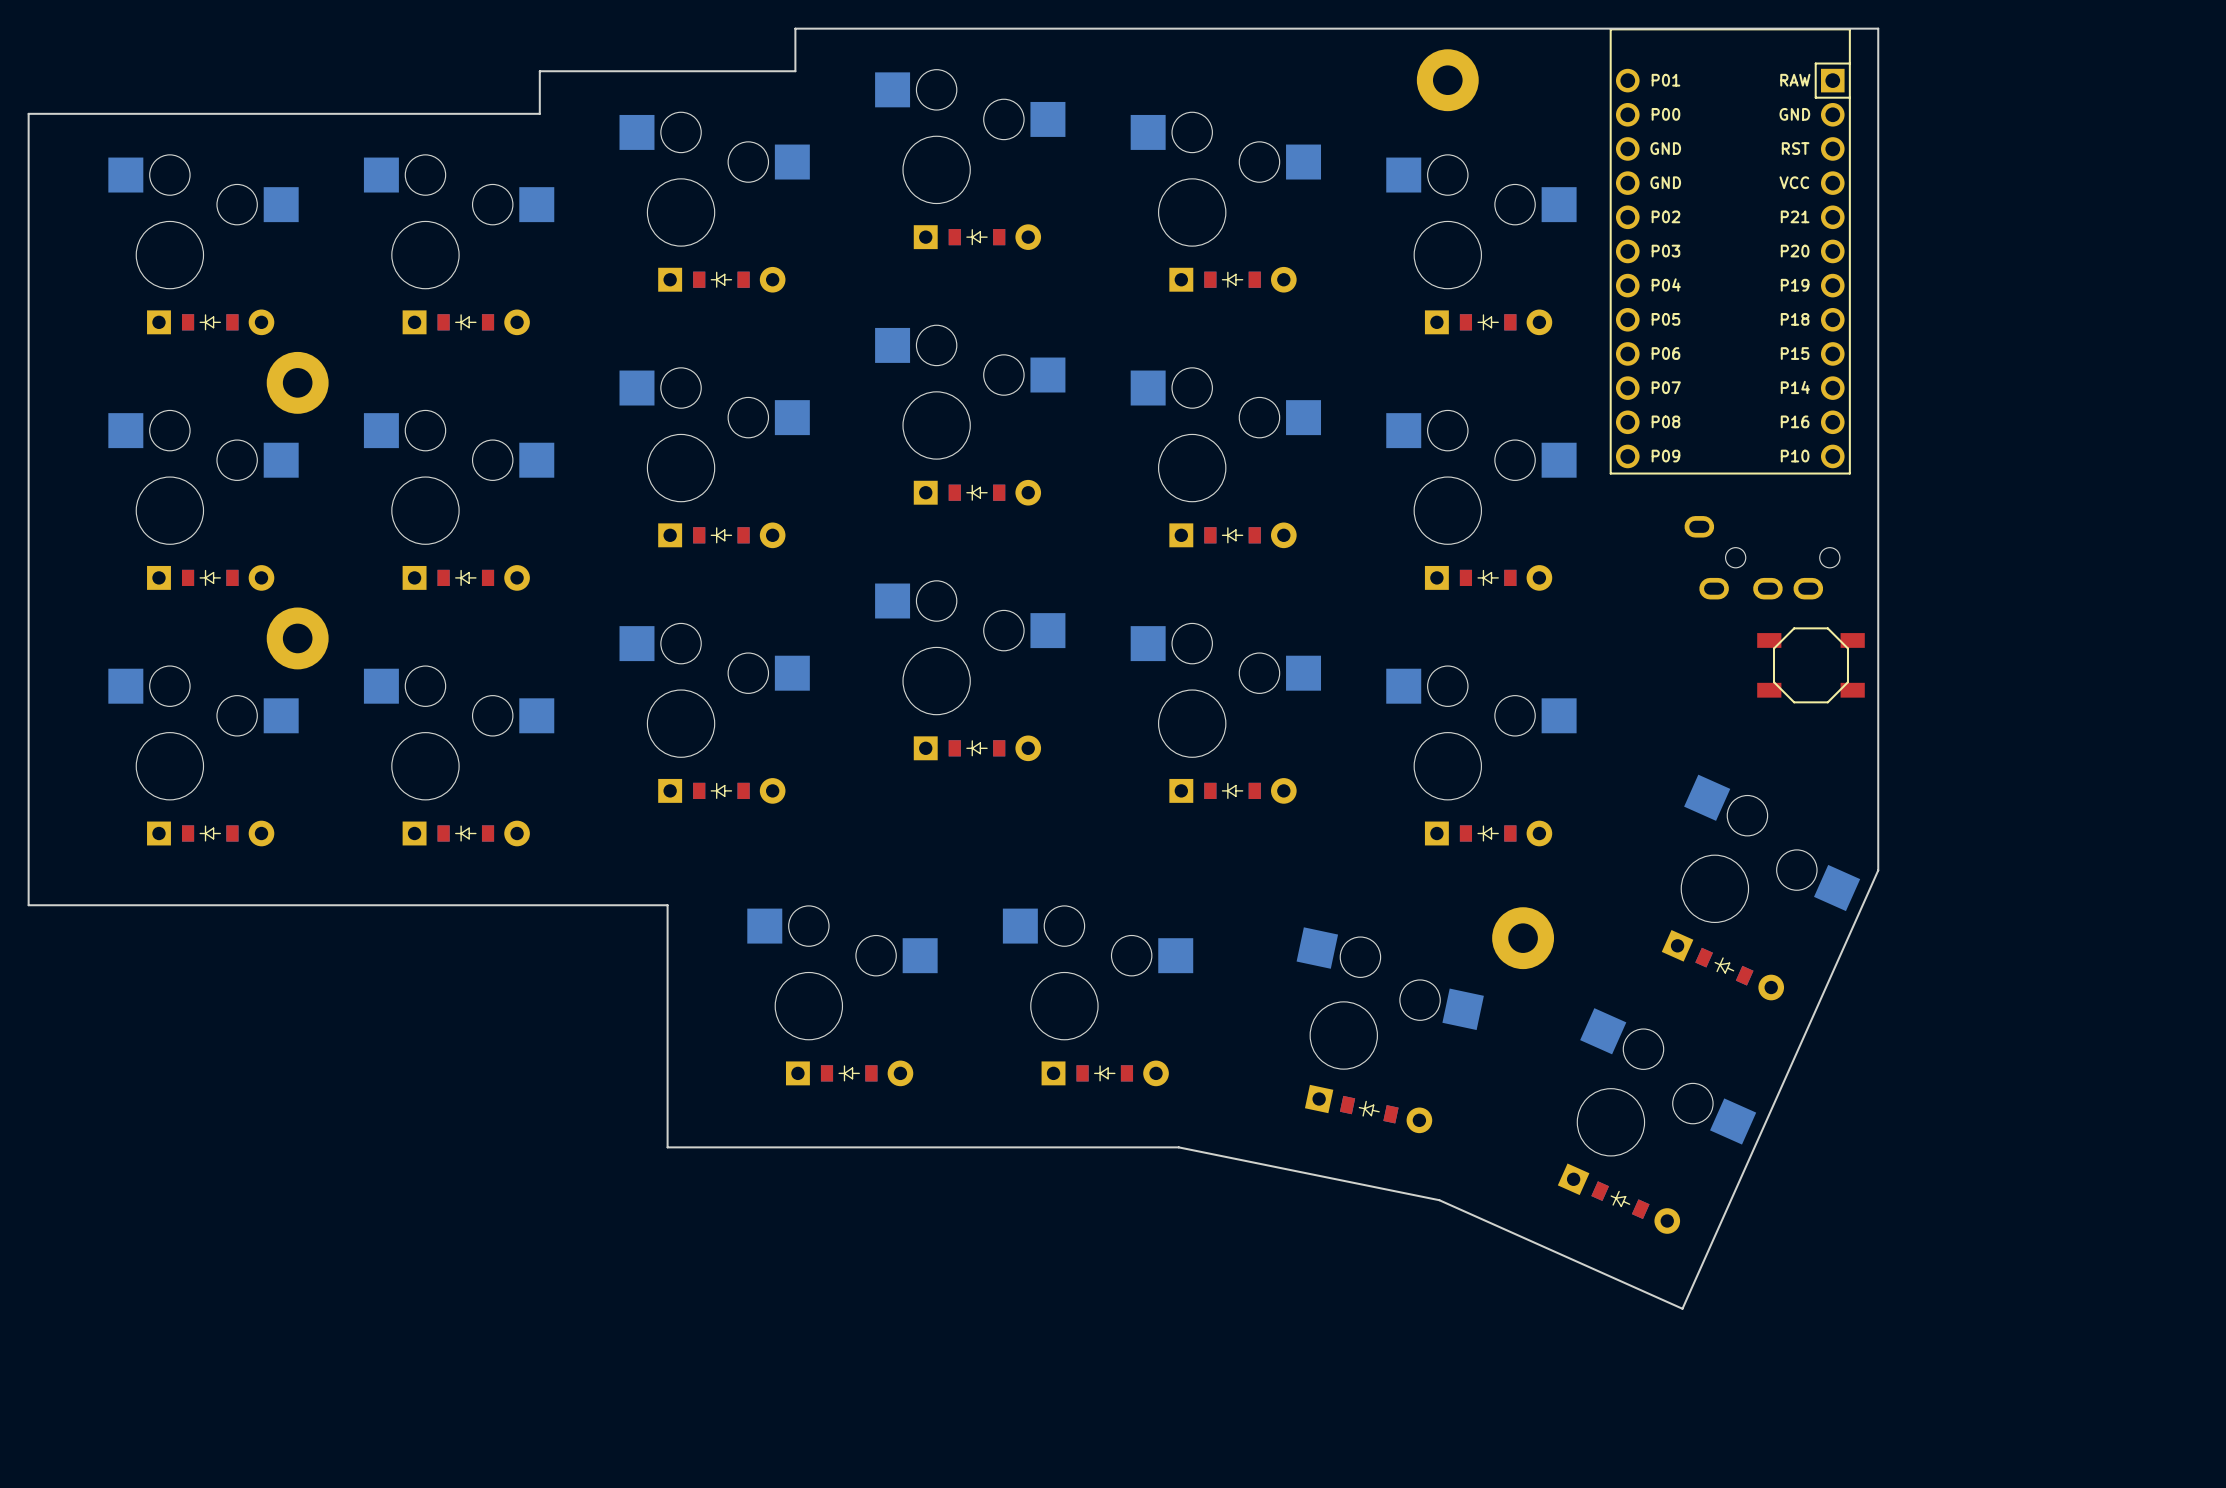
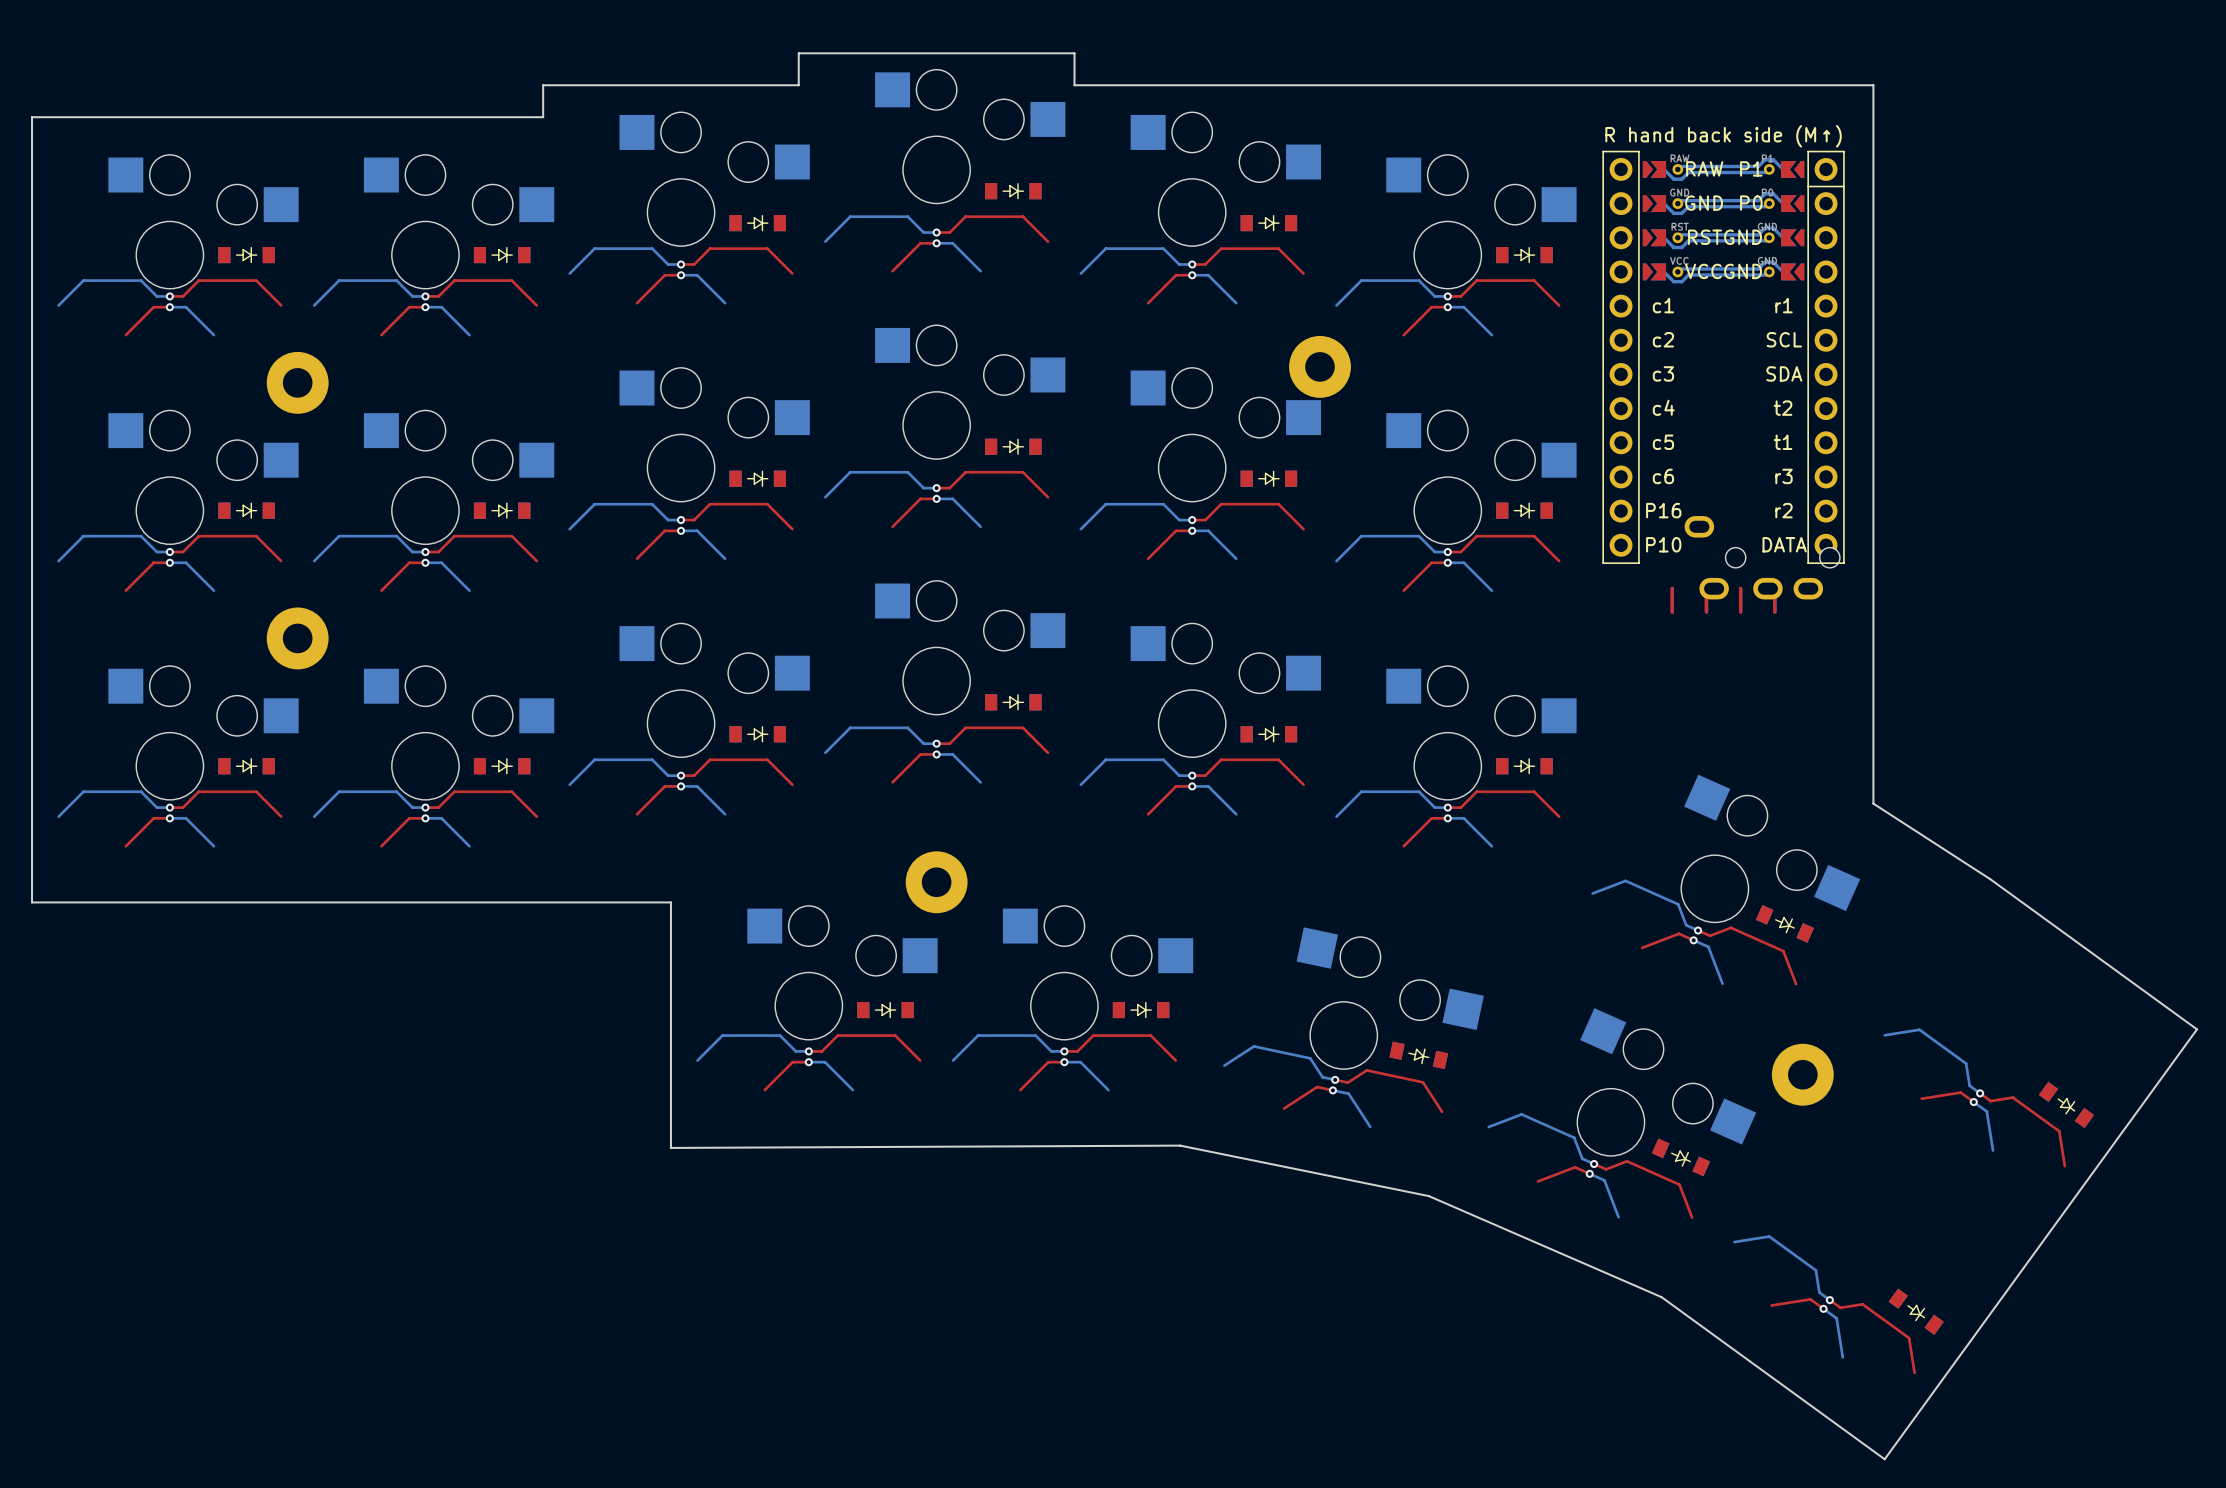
board edge: (795, 28) (795, 71) (539, 71) (539, 113) (28, 113) (28, 905) (667, 905) (667, 1147) (1178, 1147) (1439, 1200) (1682, 1308) (1878, 870) (1878, 28) (795, 28) -> (798, 53) (798, 85) (543, 85) (543, 117) (32, 117) (32, 902) (670, 902) (670, 1147) (1180, 1145) (1428, 1196) (1661, 1297) (1884, 1459) (2197, 1029) (1990, 879) (1873, 803) (1873, 85) (1074, 85) (1074, 53) (798, 53)
part: (1447, 80) -> none
bottom track: none -> (1680, 166) (1758, 166) (1765, 159) (1773, 159) (1783, 169) (1787, 169)
bottom track: none -> (1659, 169) (1664, 169) (1673, 179) (1681, 179) (1688, 172) (1766, 172)
part: none -> (1013, 191)
bottom track: none -> (1680, 200) (1758, 200) (1765, 193) (1773, 193) (1783, 203) (1787, 203)
bottom track: none -> (1659, 203) (1664, 203) (1673, 213) (1681, 213) (1688, 206) (1766, 206)
part: none -> (757, 223)
part: none -> (1268, 223)
top track: none -> (936, 232) (949, 232) (965, 216) (1023, 216) (1047, 241)
bottom track: none -> (936, 232) (923, 232) (907, 216) (850, 216) (825, 241)
via: none -> (936, 232)
bottom track: none -> (1680, 234) (1758, 234) (1765, 228) (1773, 228) (1783, 237) (1787, 237)
part: (977, 237) -> none
bottom track: none -> (1659, 237) (1664, 237) (1673, 247) (1681, 247) (1688, 240) (1766, 240)
top track: none -> (936, 243) (920, 243) (892, 271)
bottom track: none -> (936, 243) (952, 243) (980, 271)
via: none -> (936, 243)
part: (1730, 251) -> none
part: none -> (246, 255)
part: none -> (502, 255)
part: none -> (1524, 255)
top track: none -> (681, 264) (694, 264) (710, 248) (767, 248) (792, 273)
bottom track: none -> (681, 264) (668, 264) (652, 248) (594, 248) (569, 273)
via: none -> (681, 264)
top track: none -> (1192, 264) (1205, 264) (1221, 248) (1278, 248) (1303, 273)
bottom track: none -> (1192, 264) (1179, 264) (1163, 248) (1105, 248) (1080, 273)
via: none -> (1192, 264)
bottom track: none -> (1680, 268) (1758, 268) (1765, 262) (1773, 262) (1783, 271) (1787, 271)
bottom track: none -> (1659, 271) (1664, 271) (1673, 281) (1681, 281) (1688, 275) (1766, 275)
top track: none -> (681, 275) (664, 275) (636, 303)
bottom track: none -> (681, 275) (697, 275) (725, 303)
via: none -> (681, 275)
top track: none -> (1192, 275) (1176, 275) (1148, 303)
bottom track: none -> (1192, 275) (1208, 275) (1236, 303)
via: none -> (1192, 275)
part: (721, 279) -> none
part: (1232, 279) -> none
top track: none -> (169, 296) (183, 296) (198, 280) (256, 280) (281, 305)
bottom track: none -> (169, 296) (156, 296) (141, 280) (83, 280) (58, 305)
via: none -> (169, 296)
top track: none -> (425, 296) (438, 296) (454, 280) (511, 280) (536, 305)
bottom track: none -> (425, 296) (412, 296) (396, 280) (339, 280) (314, 305)
via: none -> (425, 296)
top track: none -> (1447, 296) (1460, 296) (1476, 280) (1534, 280) (1559, 305)
bottom track: none -> (1447, 296) (1434, 296) (1419, 280) (1361, 280) (1336, 305)
via: none -> (1447, 296)
top track: none -> (169, 307) (153, 307) (125, 335)
bottom track: none -> (169, 307) (186, 307) (213, 335)
via: none -> (169, 307)
top track: none -> (425, 307) (409, 307) (381, 335)
bottom track: none -> (425, 307) (441, 307) (469, 335)
via: none -> (425, 307)
top track: none -> (1447, 307) (1431, 307) (1403, 335)
bottom track: none -> (1447, 307) (1463, 307) (1491, 335)
via: none -> (1447, 307)
part: (210, 322) -> none
part: (466, 322) -> none
part: (1488, 322) -> none
part: none -> (1723, 357)
part: none -> (1320, 366)
part: none -> (1013, 446)
part: none -> (757, 478)
part: none -> (1268, 478)
top track: none -> (936, 488) (949, 488) (965, 472) (1023, 472) (1047, 497)
bottom track: none -> (936, 488) (923, 488) (907, 472) (850, 472) (825, 497)
via: none -> (936, 488)
part: (977, 492) -> none
top track: none -> (936, 498) (920, 498) (892, 526)
bottom track: none -> (936, 498) (952, 498) (980, 526)
via: none -> (936, 498)
part: none -> (246, 510)
part: none -> (502, 510)
part: none -> (1524, 510)
top track: none -> (681, 520) (694, 520) (710, 504) (767, 504) (792, 529)
bottom track: none -> (681, 520) (668, 520) (652, 504) (594, 504) (569, 529)
via: none -> (681, 520)
top track: none -> (1192, 520) (1205, 520) (1221, 504) (1278, 504) (1303, 529)
bottom track: none -> (1192, 520) (1179, 520) (1163, 504) (1105, 504) (1080, 529)
via: none -> (1192, 520)
top track: none -> (681, 530) (664, 530) (636, 558)
bottom track: none -> (681, 530) (697, 530) (725, 558)
via: none -> (681, 530)
top track: none -> (1192, 530) (1176, 530) (1148, 558)
bottom track: none -> (1192, 530) (1208, 530) (1236, 558)
via: none -> (1192, 530)
part: (721, 535) -> none
part: (1232, 535) -> none
top track: none -> (169, 552) (183, 552) (198, 536) (256, 536) (281, 561)
bottom track: none -> (169, 552) (156, 552) (141, 536) (83, 536) (58, 561)
via: none -> (169, 552)
top track: none -> (425, 552) (438, 552) (454, 536) (511, 536) (536, 561)
bottom track: none -> (425, 552) (412, 552) (396, 536) (339, 536) (314, 561)
via: none -> (425, 552)
top track: none -> (1447, 552) (1460, 552) (1476, 536) (1534, 536) (1559, 561)
bottom track: none -> (1447, 552) (1434, 552) (1419, 536) (1361, 536) (1336, 561)
via: none -> (1447, 552)
top track: none -> (169, 562) (153, 562) (125, 590)
bottom track: none -> (169, 562) (186, 562) (213, 590)
via: none -> (169, 562)
top track: none -> (425, 562) (409, 562) (381, 590)
bottom track: none -> (425, 562) (441, 562) (469, 590)
via: none -> (425, 562)
top track: none -> (1447, 562) (1431, 562) (1403, 590)
bottom track: none -> (1447, 562) (1463, 562) (1491, 590)
via: none -> (1447, 562)
part: (210, 577) -> none
part: (466, 577) -> none
part: (1488, 577) -> none
top track: none -> (1672, 588) (1672, 611)
top track: none -> (1706, 588) (1706, 611)
top track: none -> (1740, 588) (1740, 611)
top track: none -> (1774, 588) (1774, 611)
part: (1810, 665) -> none
part: none -> (1013, 702)
part: none -> (757, 734)
part: none -> (1268, 734)
top track: none -> (936, 743) (949, 743) (965, 727) (1023, 727) (1047, 752)
bottom track: none -> (936, 743) (923, 743) (907, 727) (850, 727) (825, 752)
via: none -> (936, 743)
part: (977, 748) -> none
top track: none -> (936, 754) (920, 754) (892, 782)
bottom track: none -> (936, 754) (952, 754) (980, 782)
via: none -> (936, 754)
part: none -> (246, 766)
part: none -> (502, 766)
part: none -> (1524, 766)
top track: none -> (681, 775) (694, 775) (710, 759) (767, 759) (792, 784)
bottom track: none -> (681, 775) (668, 775) (652, 759) (594, 759) (569, 784)
via: none -> (681, 775)
top track: none -> (1192, 775) (1205, 775) (1221, 759) (1278, 759) (1303, 784)
bottom track: none -> (1192, 775) (1179, 775) (1163, 759) (1105, 759) (1080, 784)
via: none -> (1192, 775)
top track: none -> (681, 786) (664, 786) (636, 814)
bottom track: none -> (681, 786) (697, 786) (725, 814)
via: none -> (681, 786)
top track: none -> (1192, 786) (1176, 786) (1148, 814)
bottom track: none -> (1192, 786) (1208, 786) (1236, 814)
via: none -> (1192, 786)
part: (721, 790) -> none
part: (1232, 790) -> none
top track: none -> (169, 807) (183, 807) (198, 791) (256, 791) (281, 816)
bottom track: none -> (169, 807) (156, 807) (141, 791) (83, 791) (58, 816)
via: none -> (169, 807)
top track: none -> (425, 807) (438, 807) (454, 791) (511, 791) (536, 816)
bottom track: none -> (425, 807) (412, 807) (396, 791) (339, 791) (314, 816)
via: none -> (425, 807)
top track: none -> (1447, 807) (1460, 807) (1476, 791) (1534, 791) (1559, 816)
bottom track: none -> (1447, 807) (1434, 807) (1419, 791) (1361, 791) (1336, 816)
via: none -> (1447, 807)
top track: none -> (169, 818) (153, 818) (125, 846)
bottom track: none -> (169, 818) (186, 818) (213, 846)
via: none -> (169, 818)
top track: none -> (425, 818) (409, 818) (381, 846)
bottom track: none -> (425, 818) (441, 818) (469, 846)
via: none -> (425, 818)
top track: none -> (1447, 818) (1431, 818) (1403, 846)
bottom track: none -> (1447, 818) (1463, 818) (1491, 846)
via: none -> (1447, 818)
part: (210, 833) -> none
part: (466, 833) -> none
part: (1488, 833) -> none
part: none -> (936, 882)
bottom track: none -> (1592, 893) (1625, 880) (1678, 904) (1686, 925) (1698, 930)
part: none -> (1784, 923)
top track: none -> (1698, 930) (1710, 935) (1730, 927) (1783, 951) (1796, 984)
via: none -> (1698, 930)
part: (1523, 938) -> none
top track: none -> (1693, 940) (1678, 933) (1642, 947)
bottom track: none -> (1693, 940) (1708, 946) (1722, 983)
via: none -> (1693, 940)
part: (1722, 965) -> none
part: none -> (885, 1010)
part: none -> (1141, 1010)
bottom track: none -> (1884, 1035) (1919, 1029) (1966, 1063) (1969, 1085) (1980, 1093)
top track: none -> (808, 1051) (821, 1051) (837, 1035) (895, 1035) (920, 1060)
bottom track: none -> (808, 1051) (795, 1051) (780, 1035) (722, 1035) (697, 1060)
via: none -> (808, 1051)
top track: none -> (1064, 1051) (1077, 1051) (1093, 1035) (1150, 1035) (1175, 1060)
bottom track: none -> (1064, 1051) (1051, 1051) (1035, 1035) (978, 1035) (953, 1060)
via: none -> (1064, 1051)
part: none -> (1418, 1055)
top track: none -> (808, 1062) (792, 1062) (764, 1090)
bottom track: none -> (808, 1062) (824, 1062) (852, 1090)
via: none -> (808, 1062)
top track: none -> (1064, 1062) (1048, 1062) (1020, 1090)
bottom track: none -> (1064, 1062) (1080, 1062) (1108, 1090)
via: none -> (1064, 1062)
bottom track: none -> (1224, 1065) (1253, 1046) (1310, 1058) (1322, 1077) (1335, 1079)
part: (849, 1073) -> none
part: (1105, 1073) -> none
part: none -> (1802, 1074)
top track: none -> (1335, 1079) (1348, 1082) (1366, 1070) (1422, 1082) (1442, 1111)
via: none -> (1335, 1079)
top track: none -> (1332, 1090) (1317, 1087) (1284, 1108)
bottom track: none -> (1332, 1090) (1348, 1093) (1370, 1126)
via: none -> (1332, 1090)
top track: none -> (1980, 1093) (1990, 1101) (2012, 1097) (2059, 1131) (2064, 1166)
via: none -> (1980, 1093)
top track: none -> (1921, 1098) (1960, 1092) (1973, 1102)
bottom track: none -> (1973, 1102) (1986, 1111) (1993, 1150)
via: none -> (1973, 1102)
part: none -> (2066, 1104)
part: (1368, 1108) -> none
bottom track: none -> (1488, 1127) (1521, 1114) (1574, 1137) (1582, 1158) (1594, 1164)
part: none -> (1680, 1157)
top track: none -> (1594, 1164) (1606, 1169) (1627, 1161) (1679, 1184) (1692, 1217)
via: none -> (1594, 1164)
top track: none -> (1589, 1173) (1574, 1167) (1538, 1181)
bottom track: none -> (1589, 1173) (1604, 1180) (1618, 1217)
via: none -> (1589, 1173)
part: (1618, 1198) -> none
bottom track: none -> (1734, 1242) (1769, 1236) (1815, 1270) (1819, 1292) (1829, 1300)
top track: none -> (1829, 1300) (1840, 1307) (1862, 1304) (1909, 1338) (1914, 1372)
via: none -> (1829, 1300)
top track: none -> (1771, 1305) (1810, 1299) (1823, 1308)
bottom track: none -> (1823, 1308) (1836, 1318) (1842, 1357)
via: none -> (1823, 1308)
part: none -> (1916, 1311)

